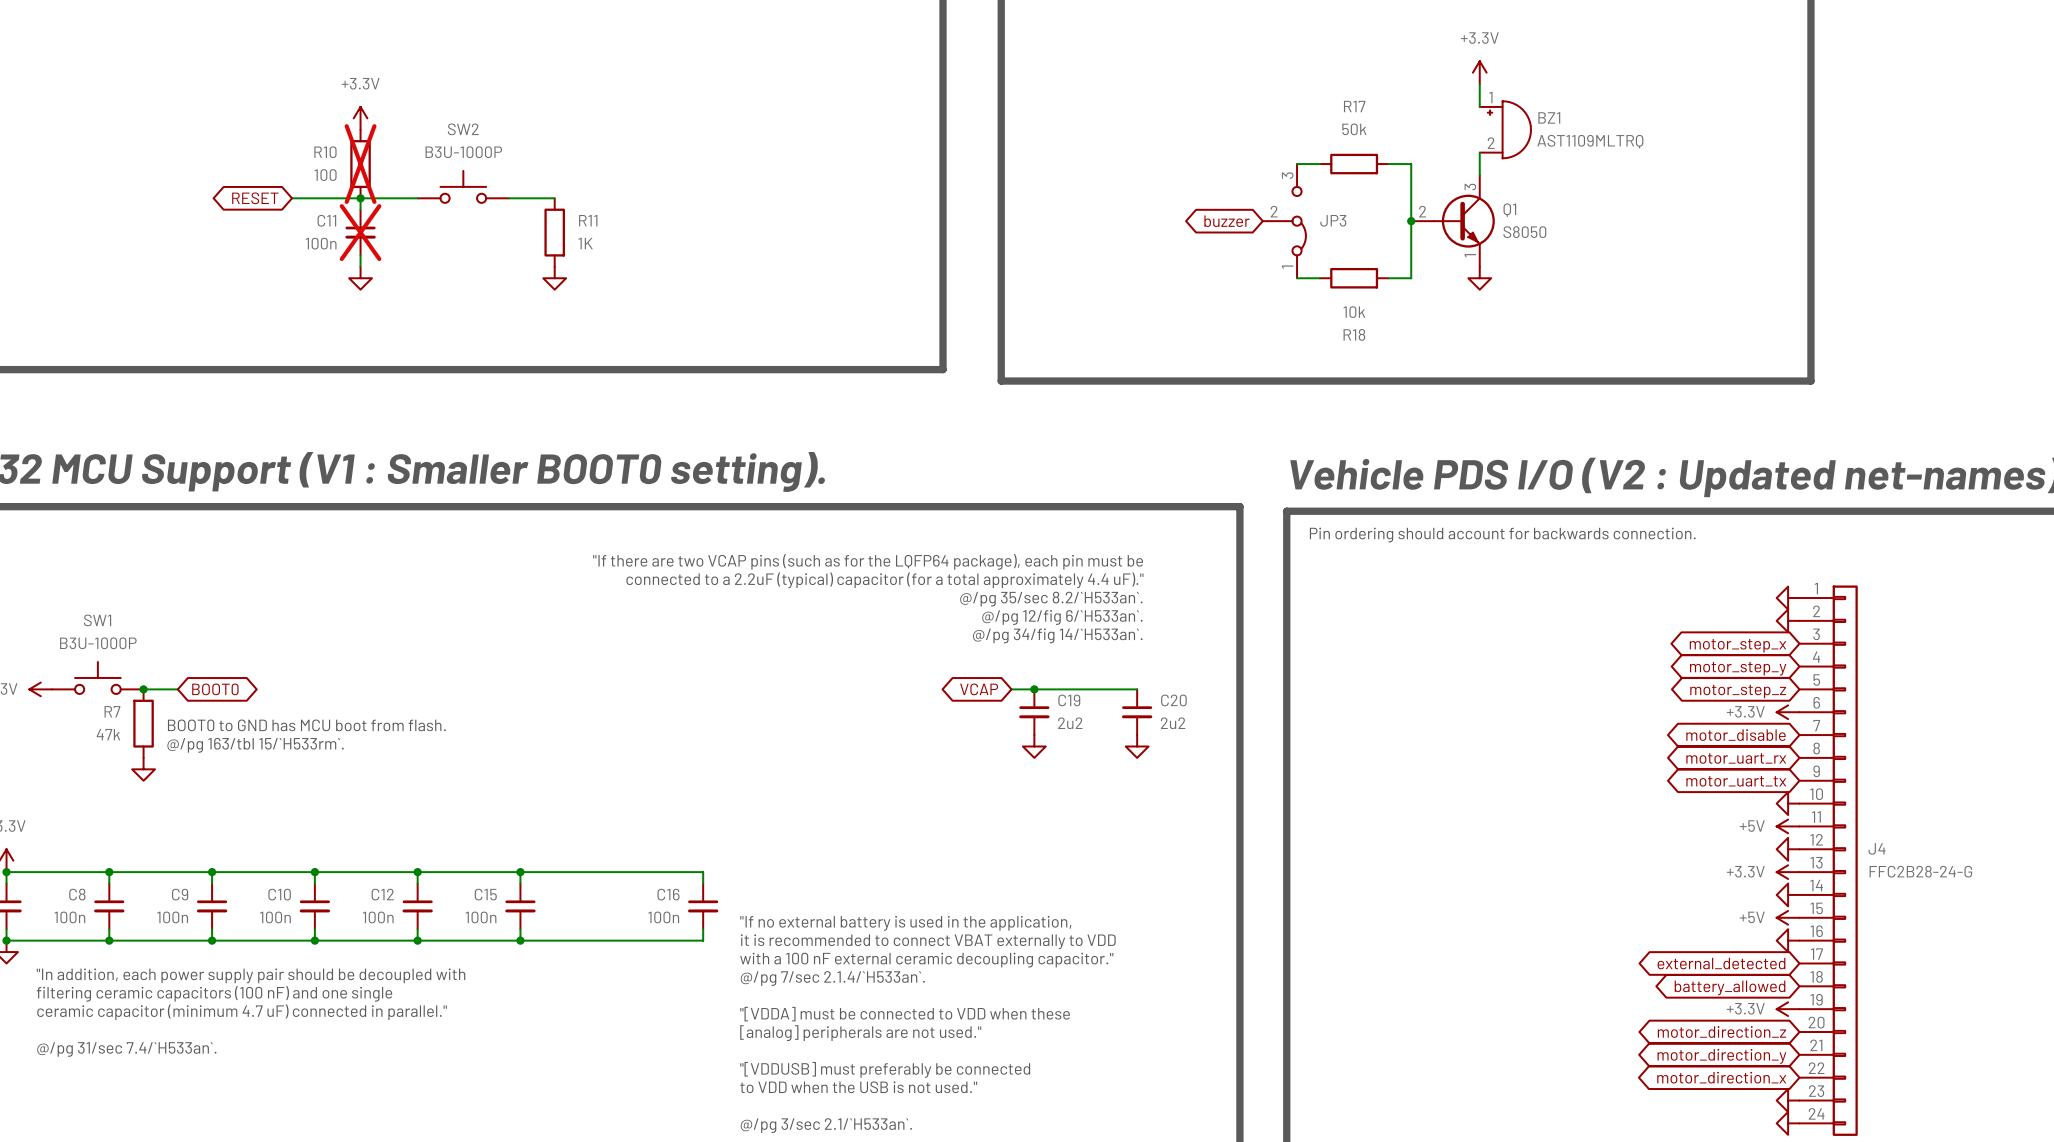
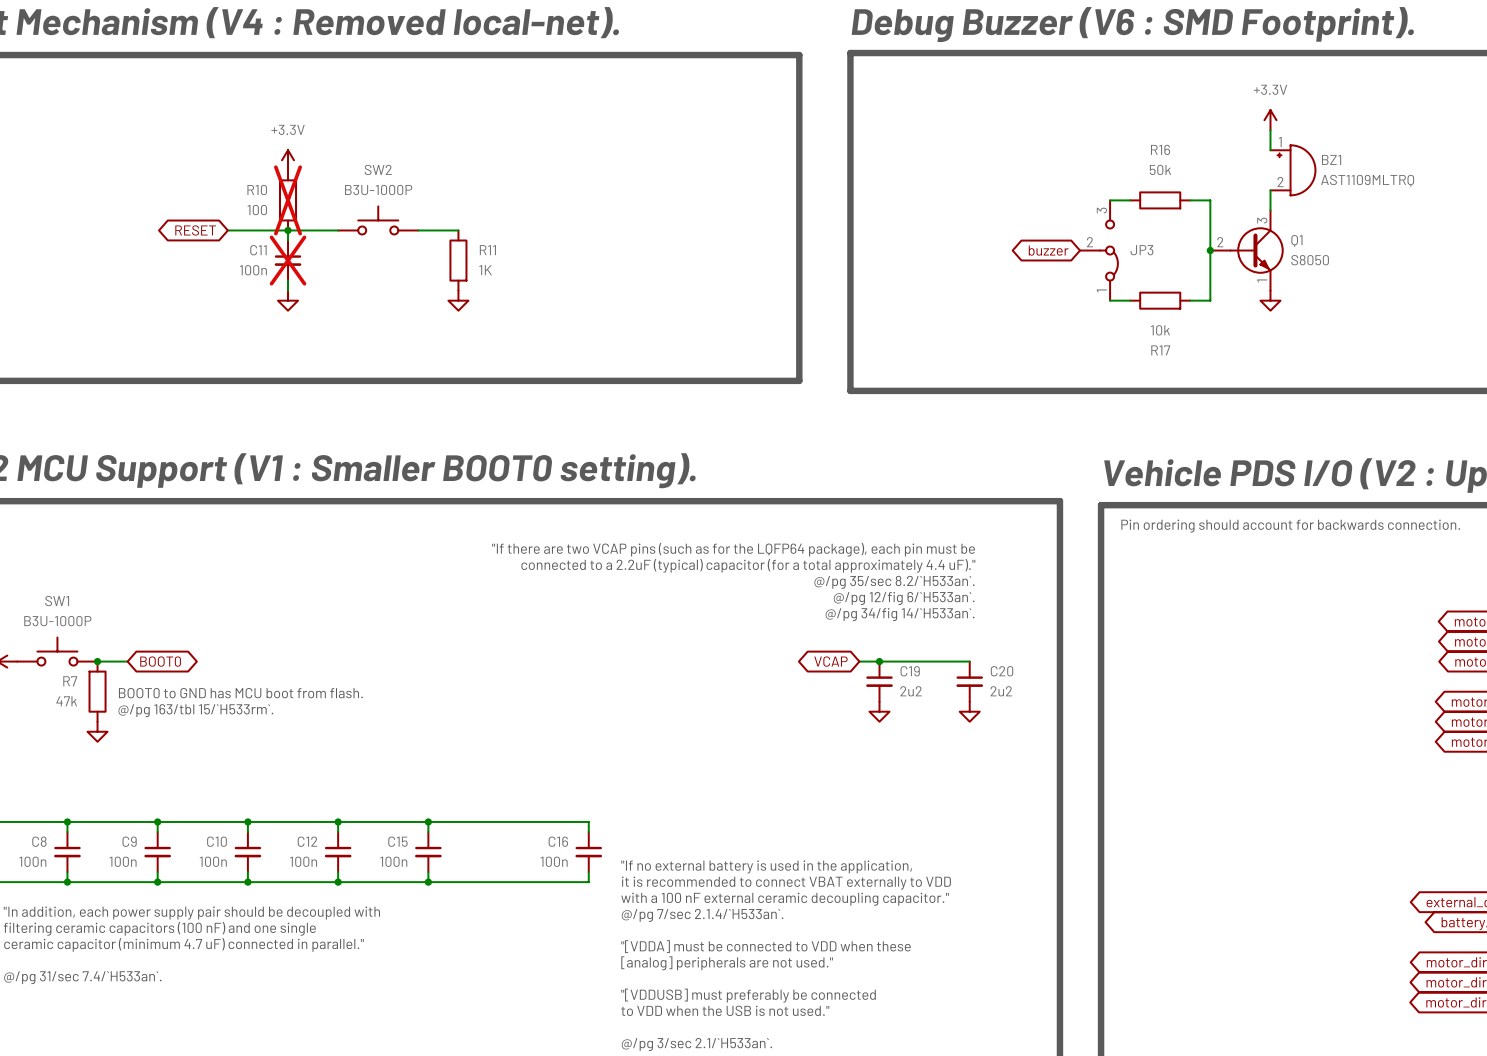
R17 name: R17 (1354, 106) -> R16 (1160, 149)
R18 name: R18 (1354, 334) -> R17 (1160, 350)

